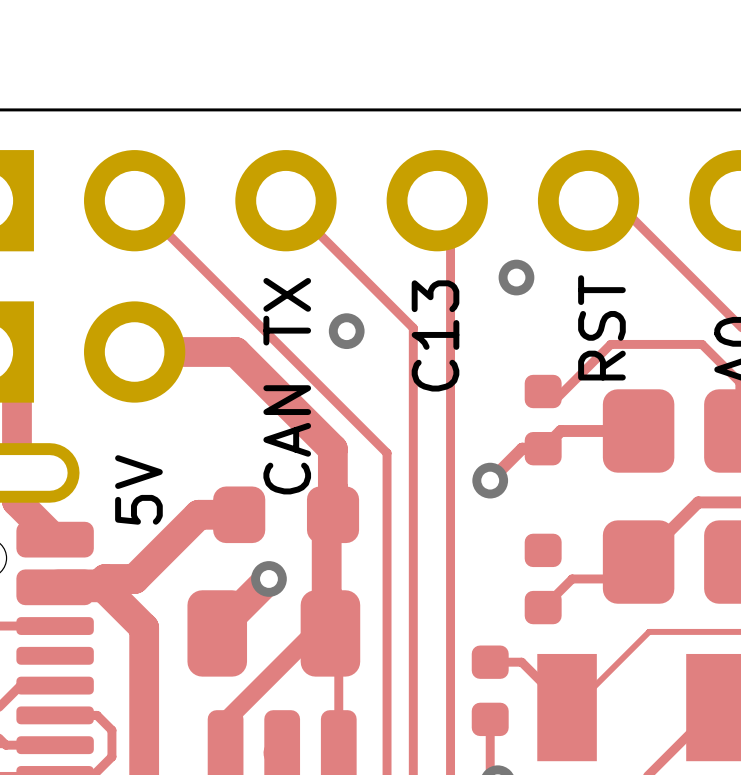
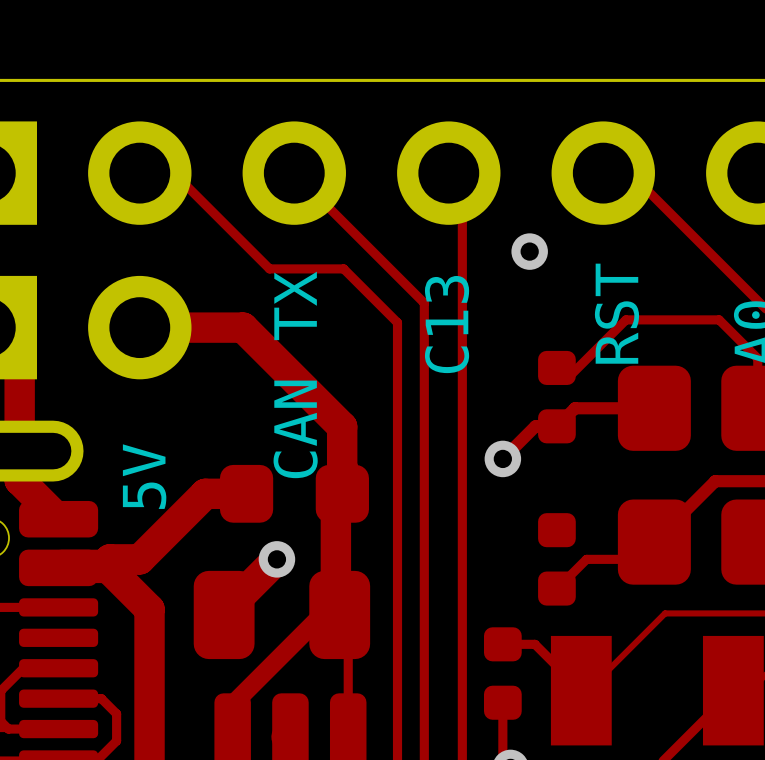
top track: (134, 200) (387, 453) -> (139, 173) (173, 173) (269, 268) (343, 268) (397, 322) (397, 430)
via: (346, 331) -> none

